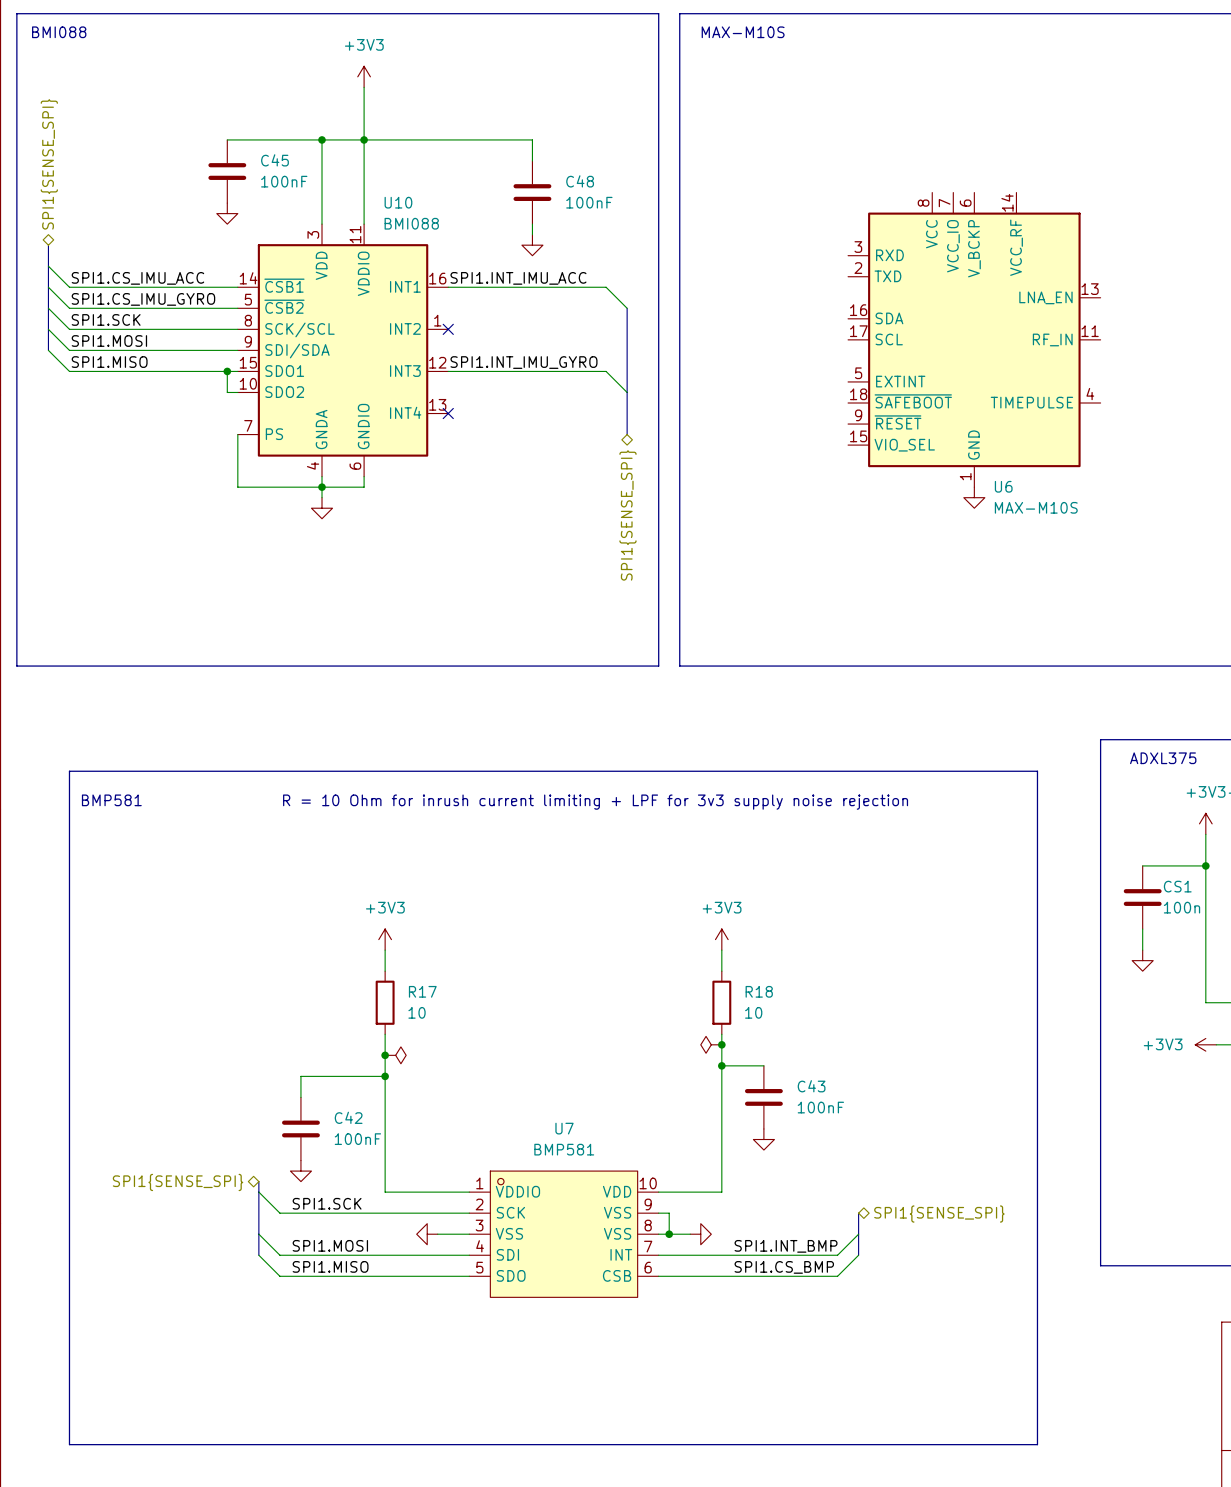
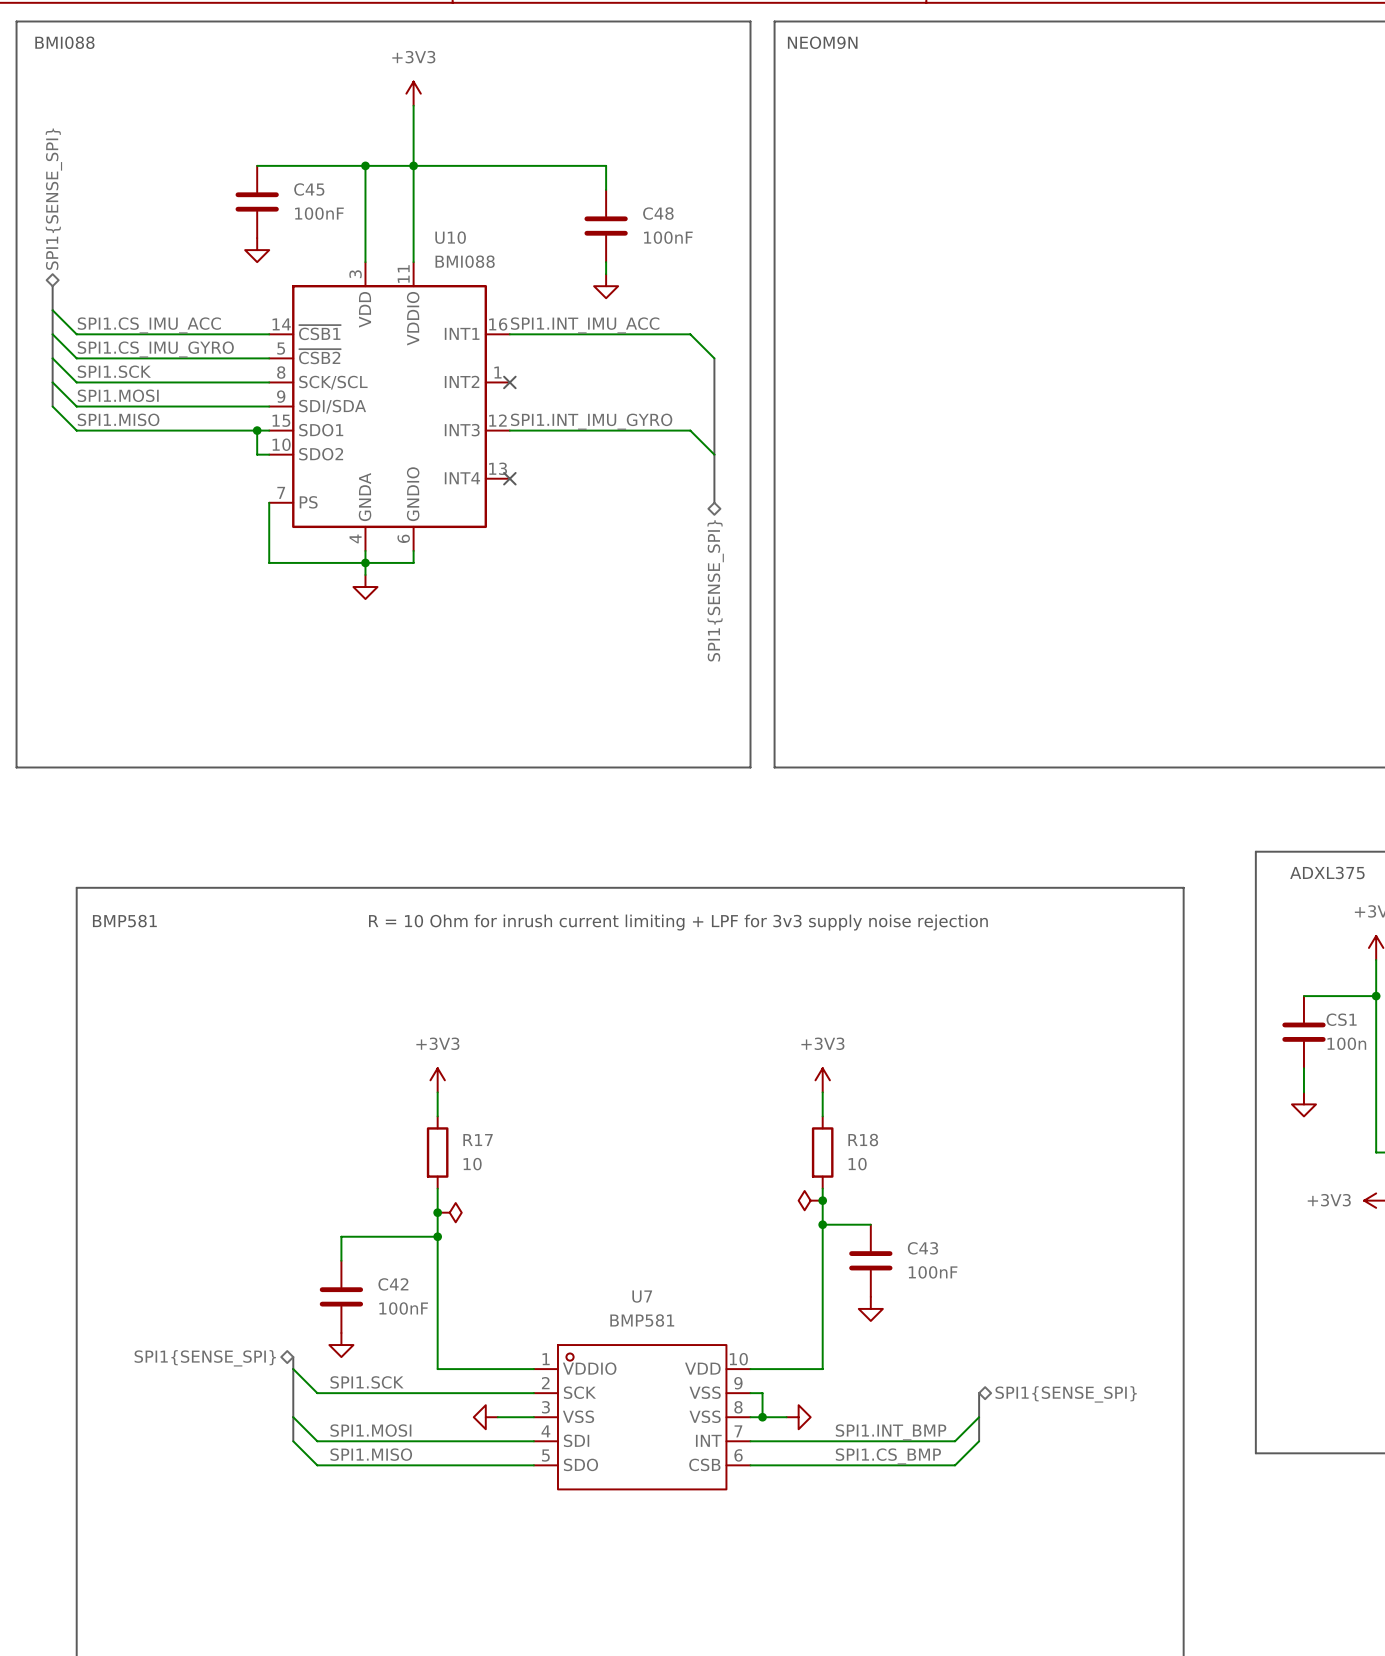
text: none -> NEOM9N (822, 42)
text: MAX-M10S (743, 32) -> none
U6: MAX-M10S (974, 339) -> none
power symbol: (974, 497) -> none

